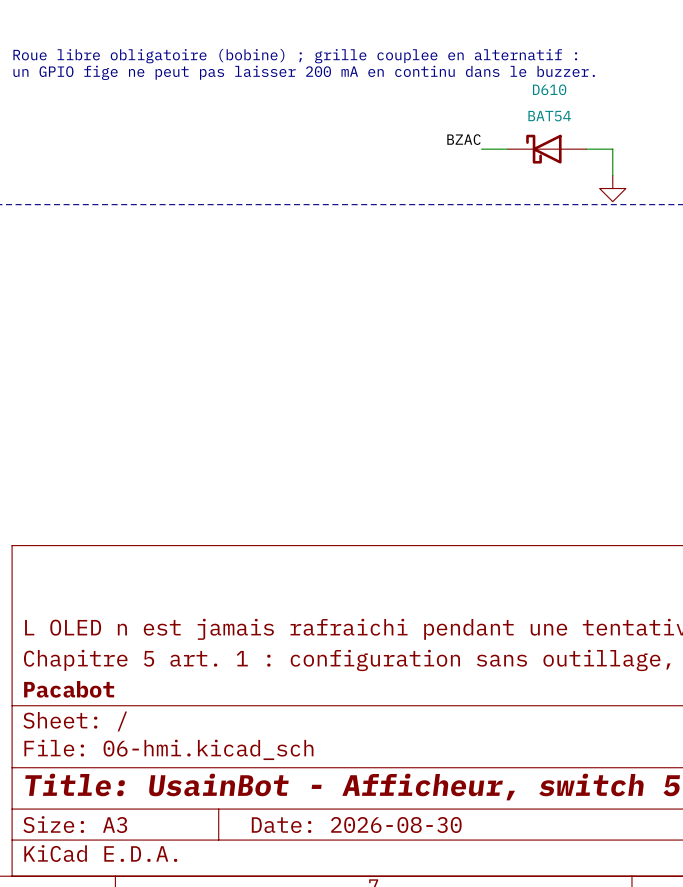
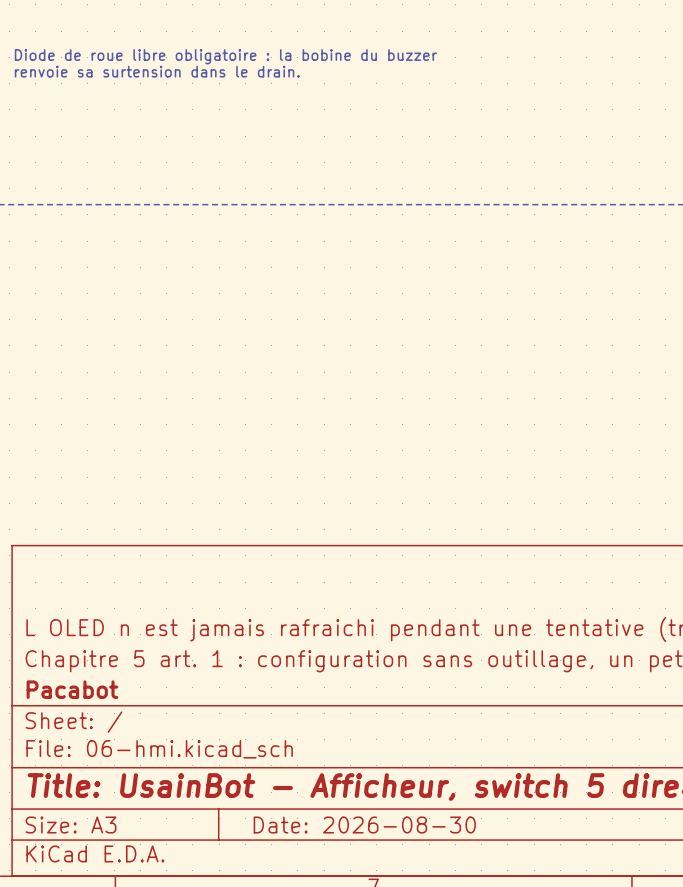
text: Roue libre obligatoire (bobine) ; grille couplee en alternatif : (295, 56) -> Diode de roue libre obligatoire : la bobine du buzzer (225, 56)
text: un GPIO fige ne peut pas laisser 200 mA en continu dans le buzzer. (304, 72) -> renvoie sa surtension dans le drain. (157, 71)
label: BZAC (463, 139) -> none
wire: (481, 149) (507, 149) -> none
D610: BAT54 (547, 149) -> none
wire: (586, 149) (612, 149) (612, 175) -> none
power symbol: (612, 188) -> none

